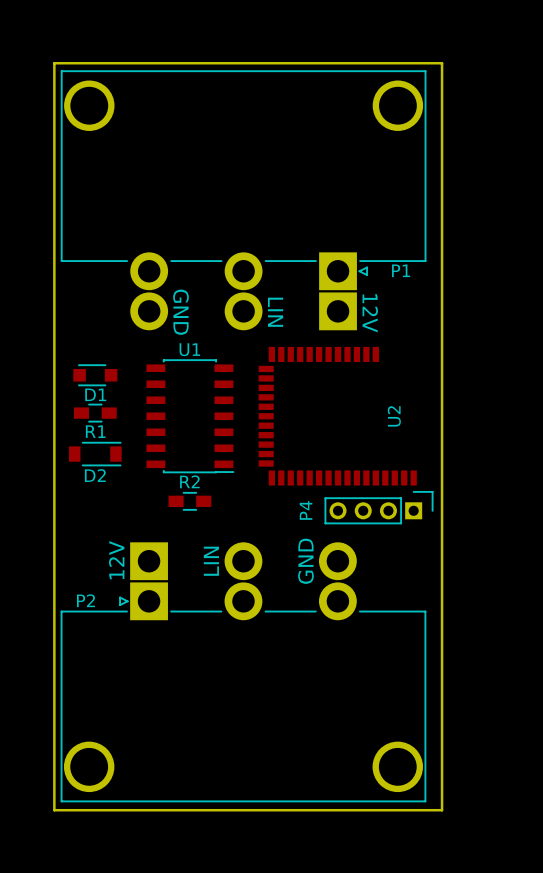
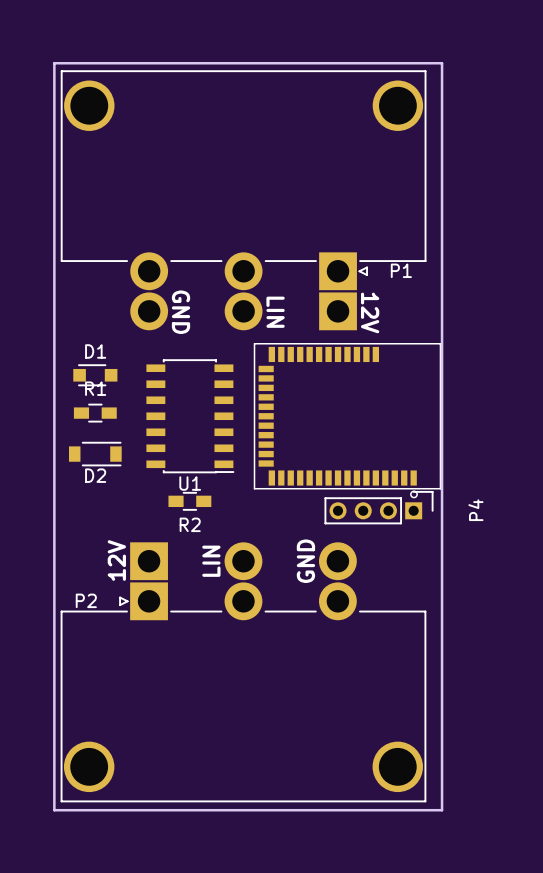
U1 name position: U1 (189, 349) -> U1 (190, 483)
D1 name position: D1 (95, 394) -> D1 (95, 351)
U2: (337, 416) -> none
part: none -> (347, 420)
R1 name position: R1 (95, 431) -> R1 (95, 388)
R2 name position: R2 (189, 481) -> R2 (190, 524)
P4 name position: P4 (306, 510) -> P4 (475, 510)

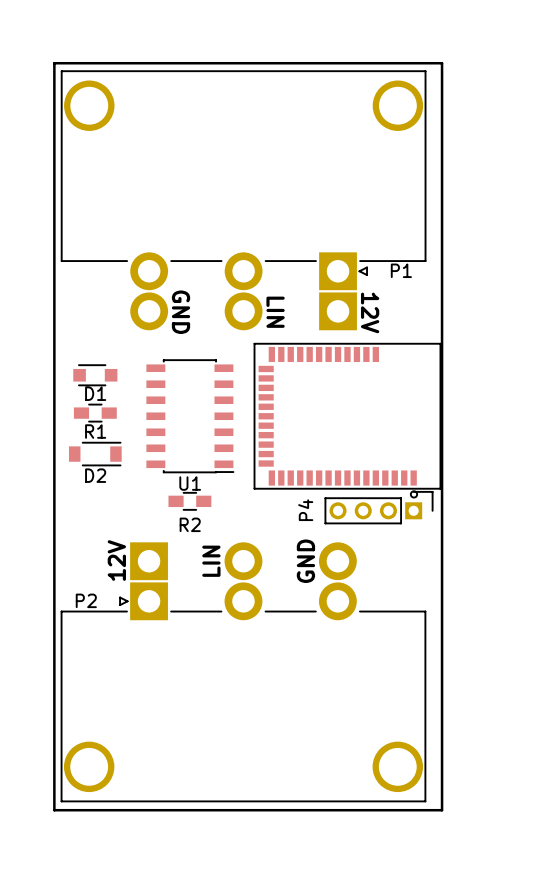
D1 name position: D1 (95, 351) -> D1 (95, 393)
R1 name position: R1 (95, 388) -> R1 (95, 431)
P4 name position: P4 (475, 510) -> P4 (305, 510)

